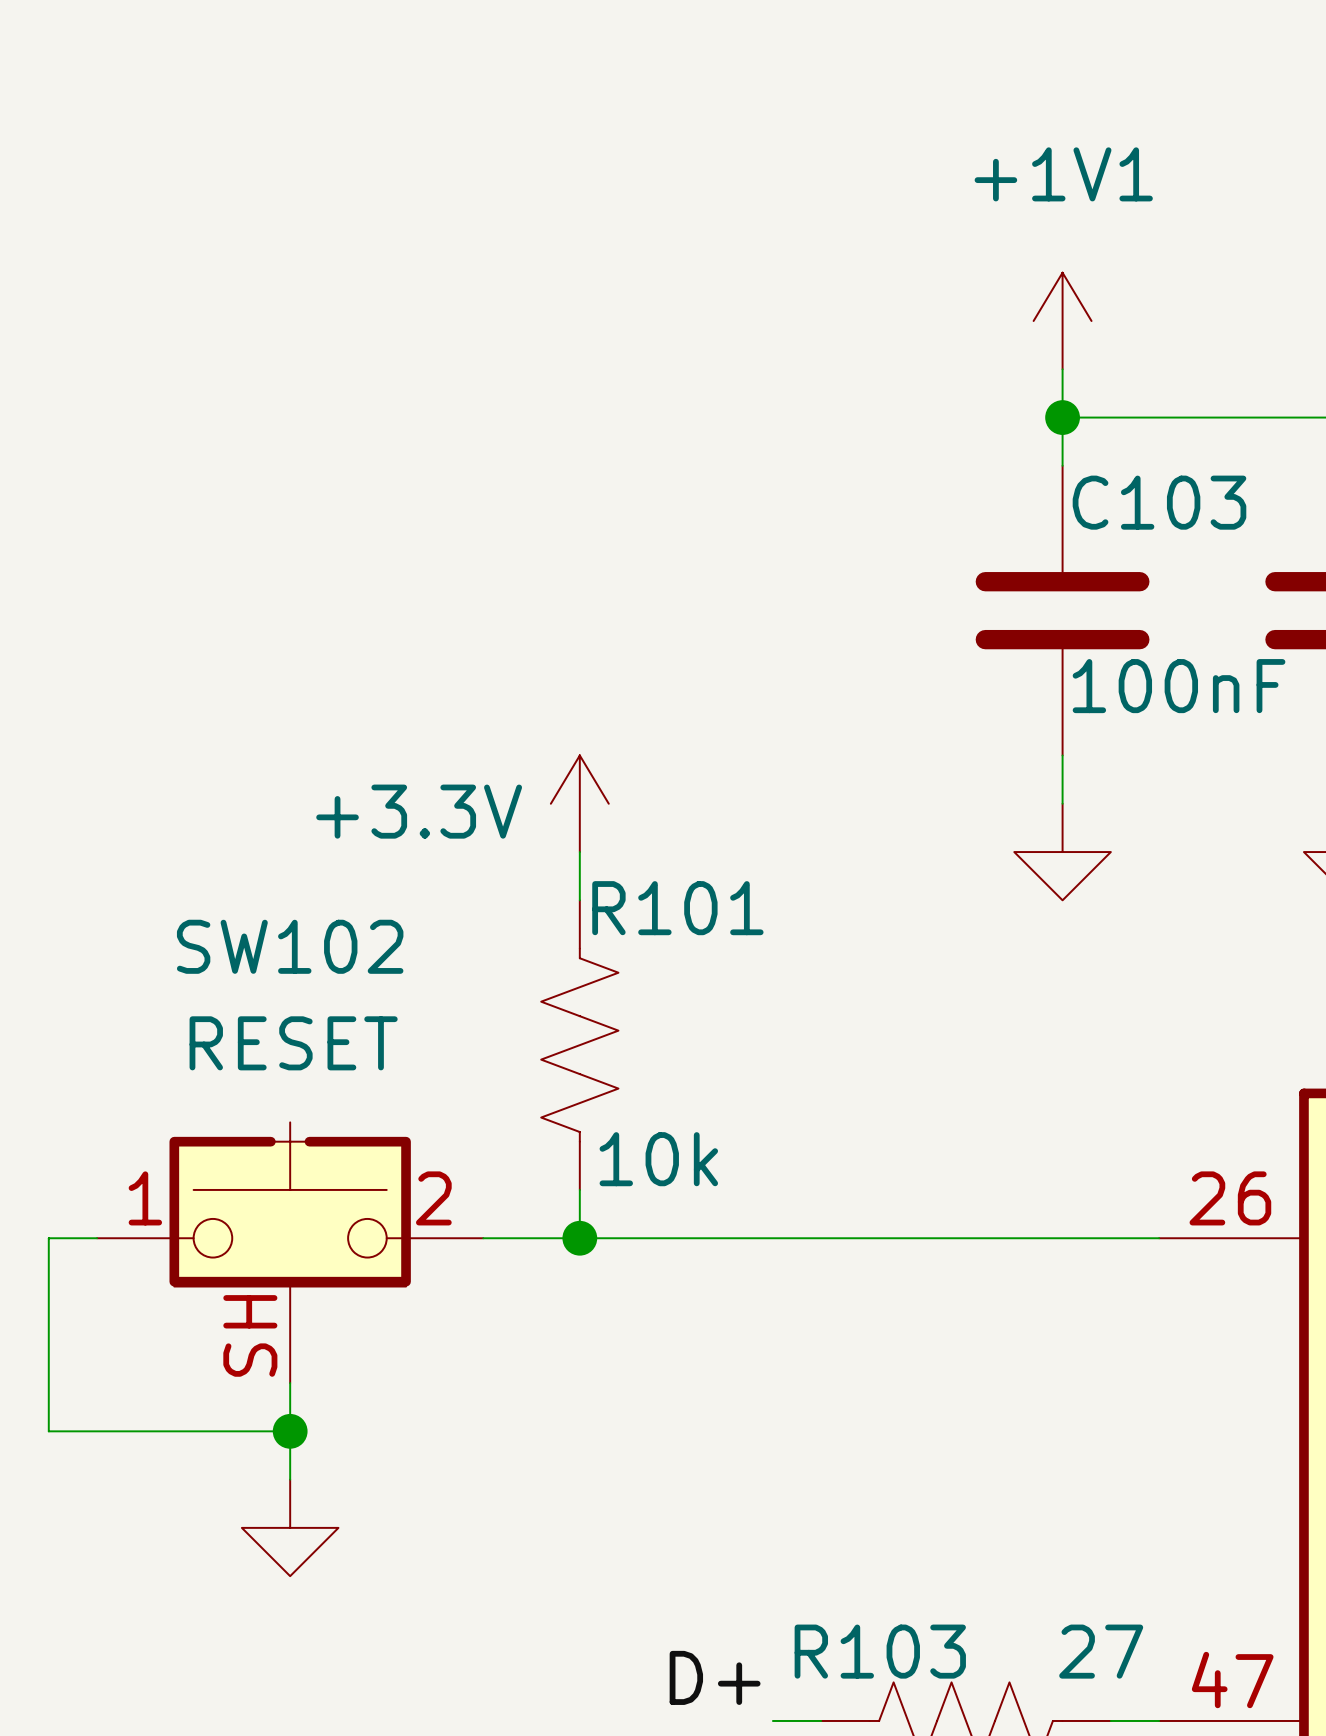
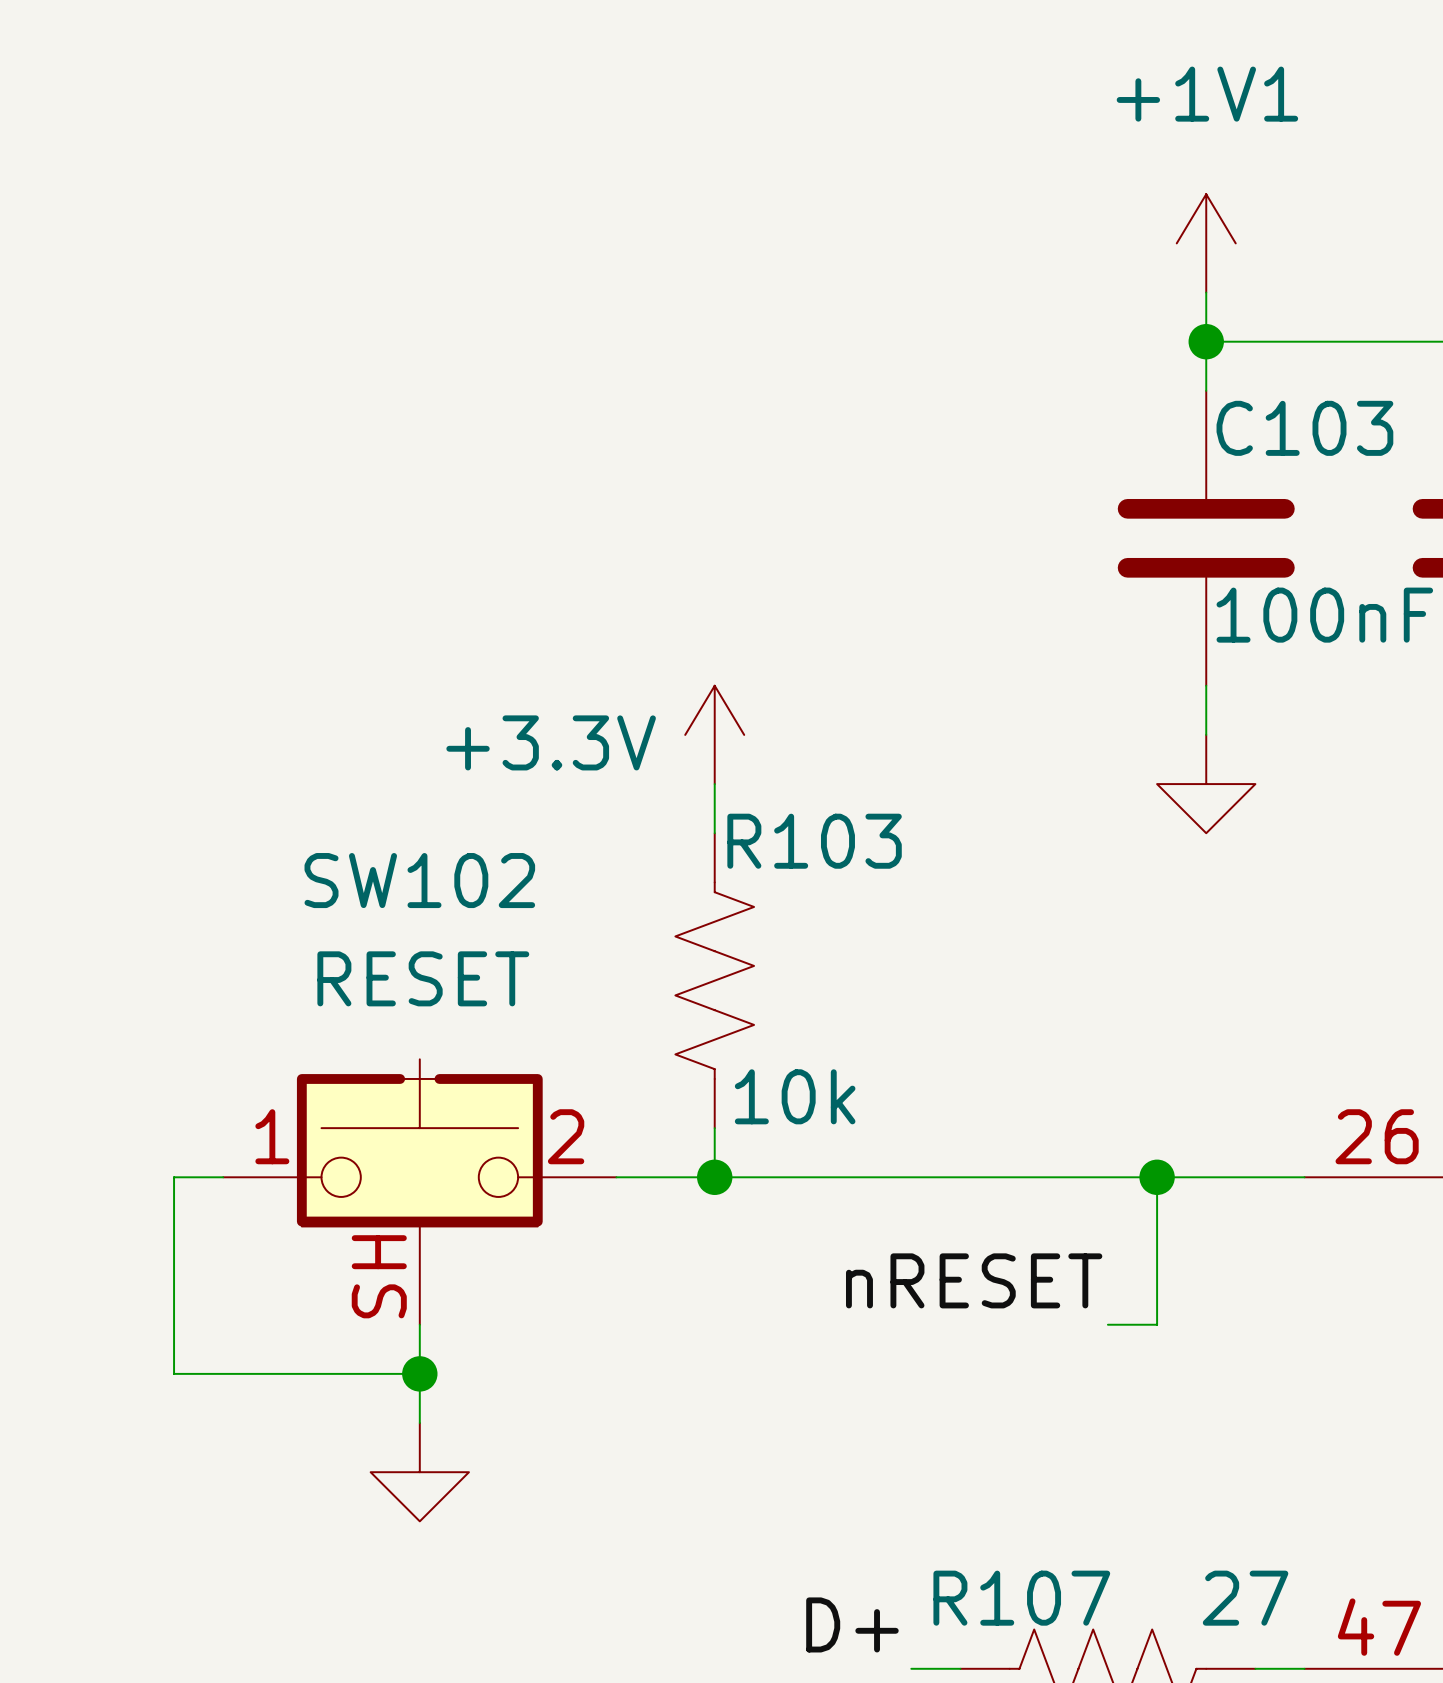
R101 name: R101 (677, 908) -> R103 (814, 841)
wire: none -> (1157, 1177) (1157, 1324) (1107, 1324)
junction: none -> (1157, 1177)
label: none -> nRESET (974, 1280)
R103 name: R103 (880, 1651) -> R107 (1021, 1598)

